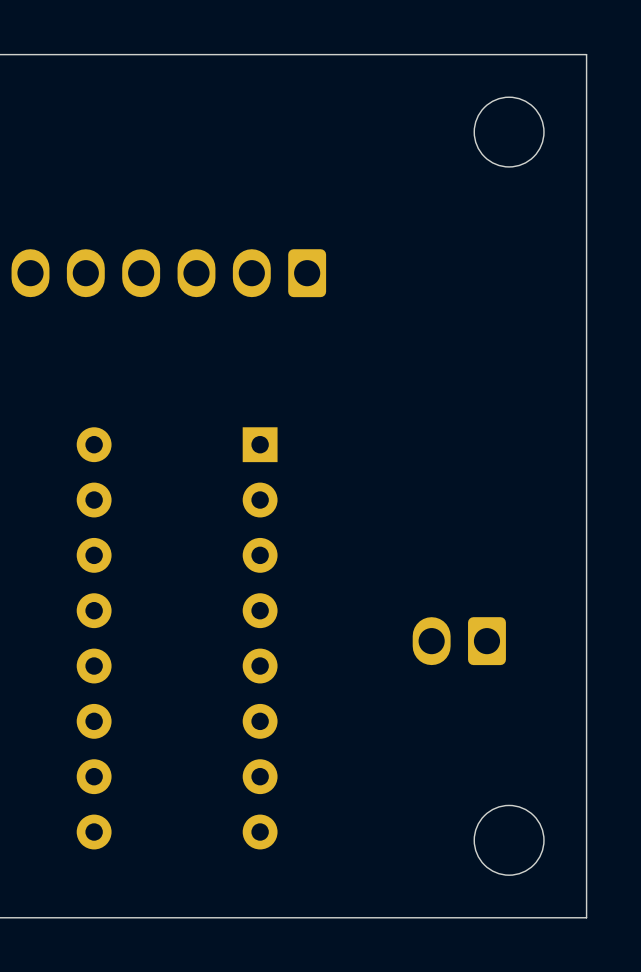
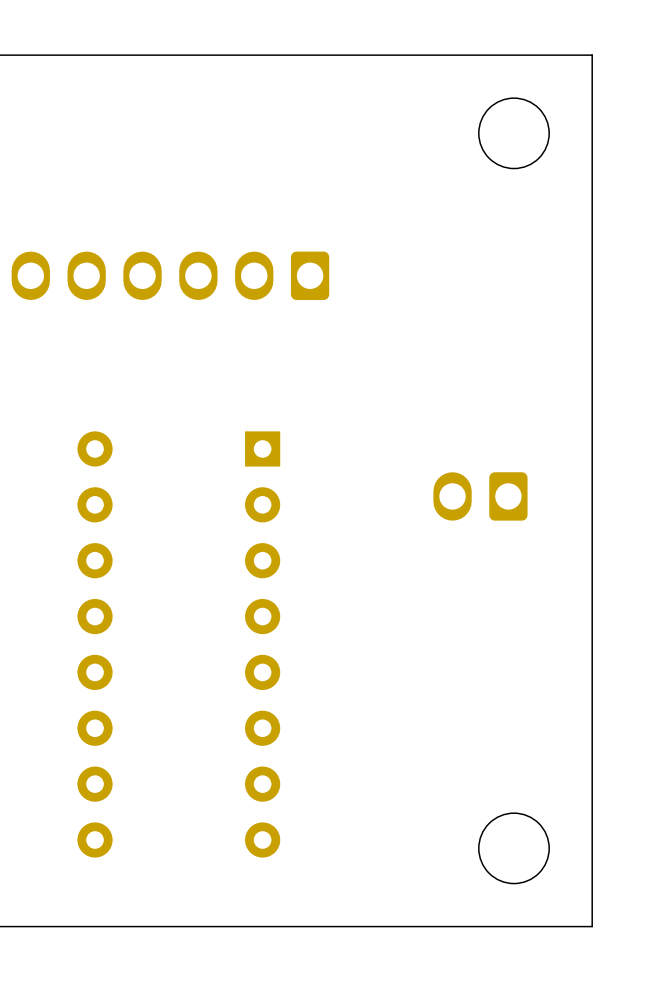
part position: (459, 641) -> (480, 496)

